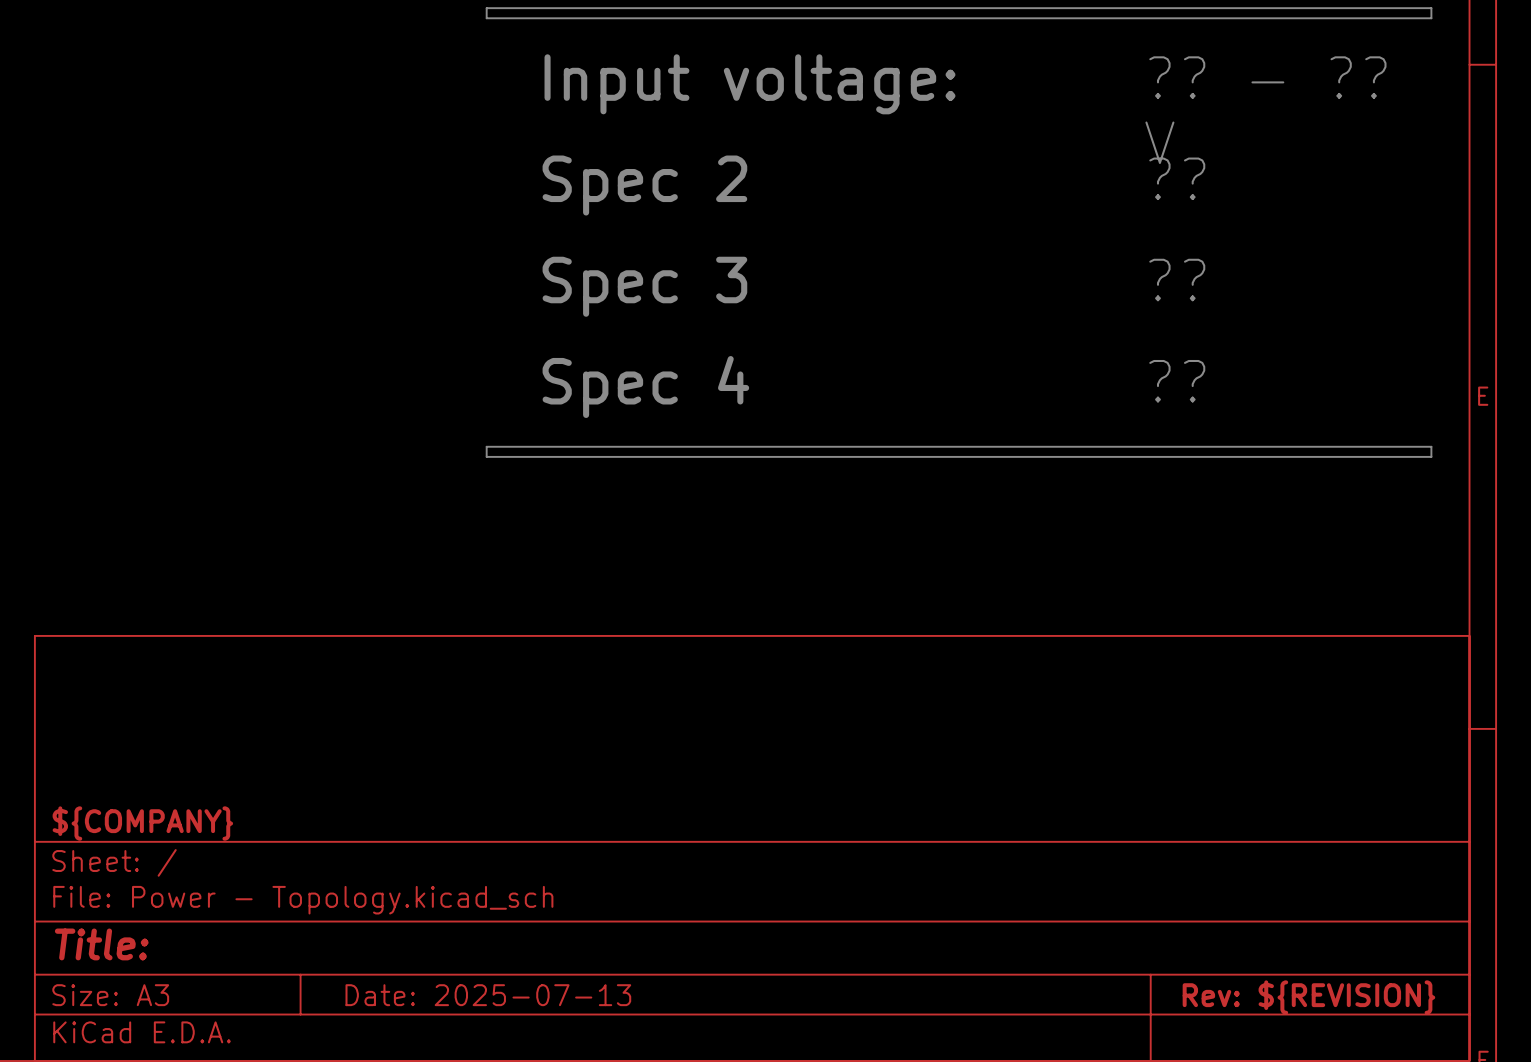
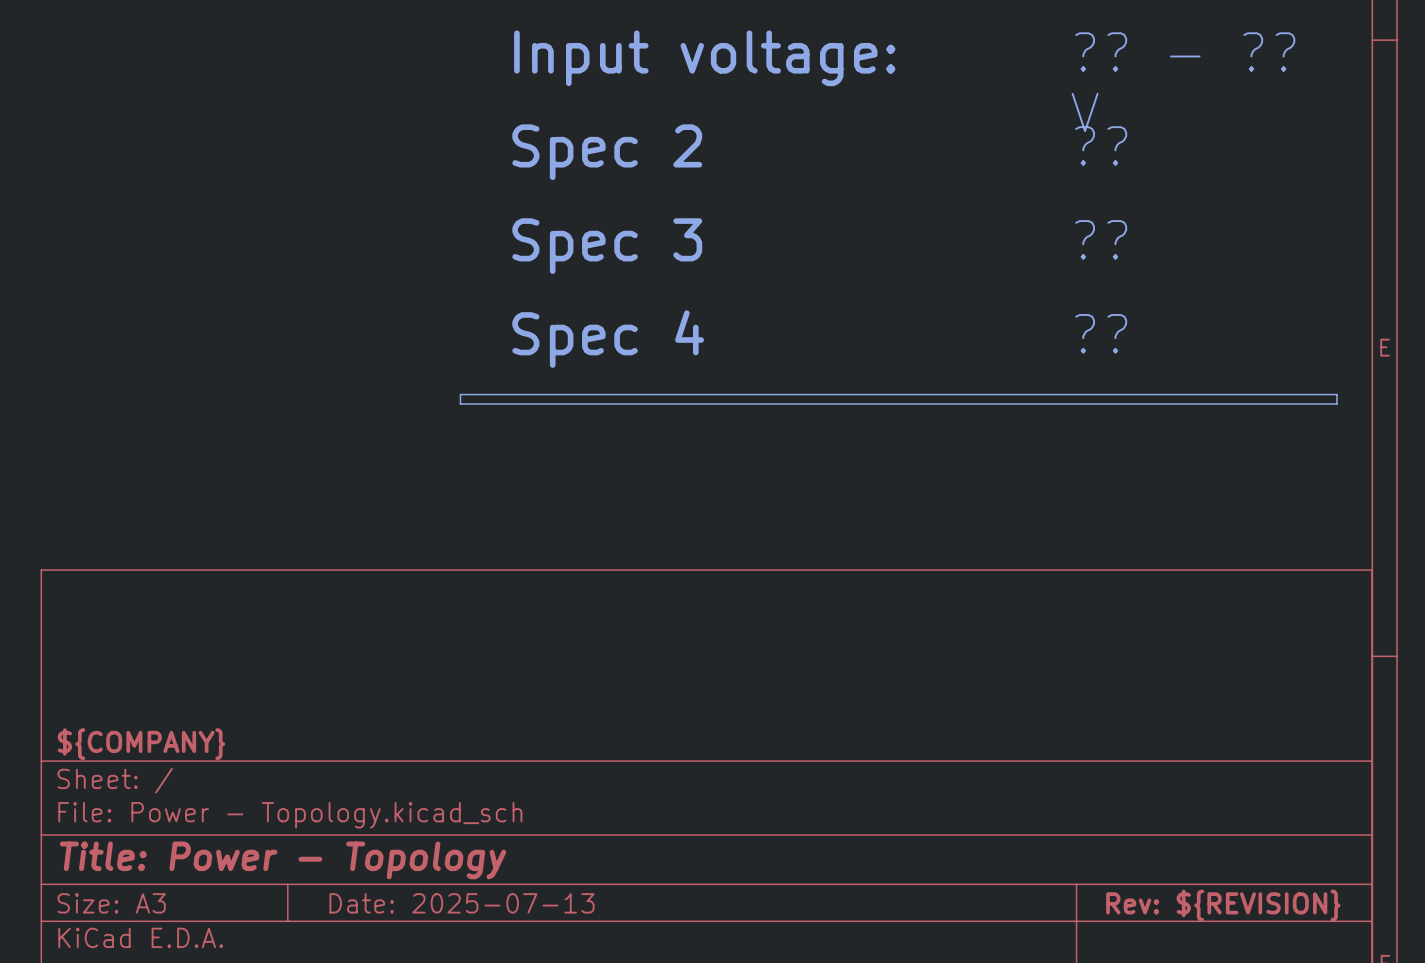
title block: Title: (101, 944) -> Title: Power - Topology (283, 860)

